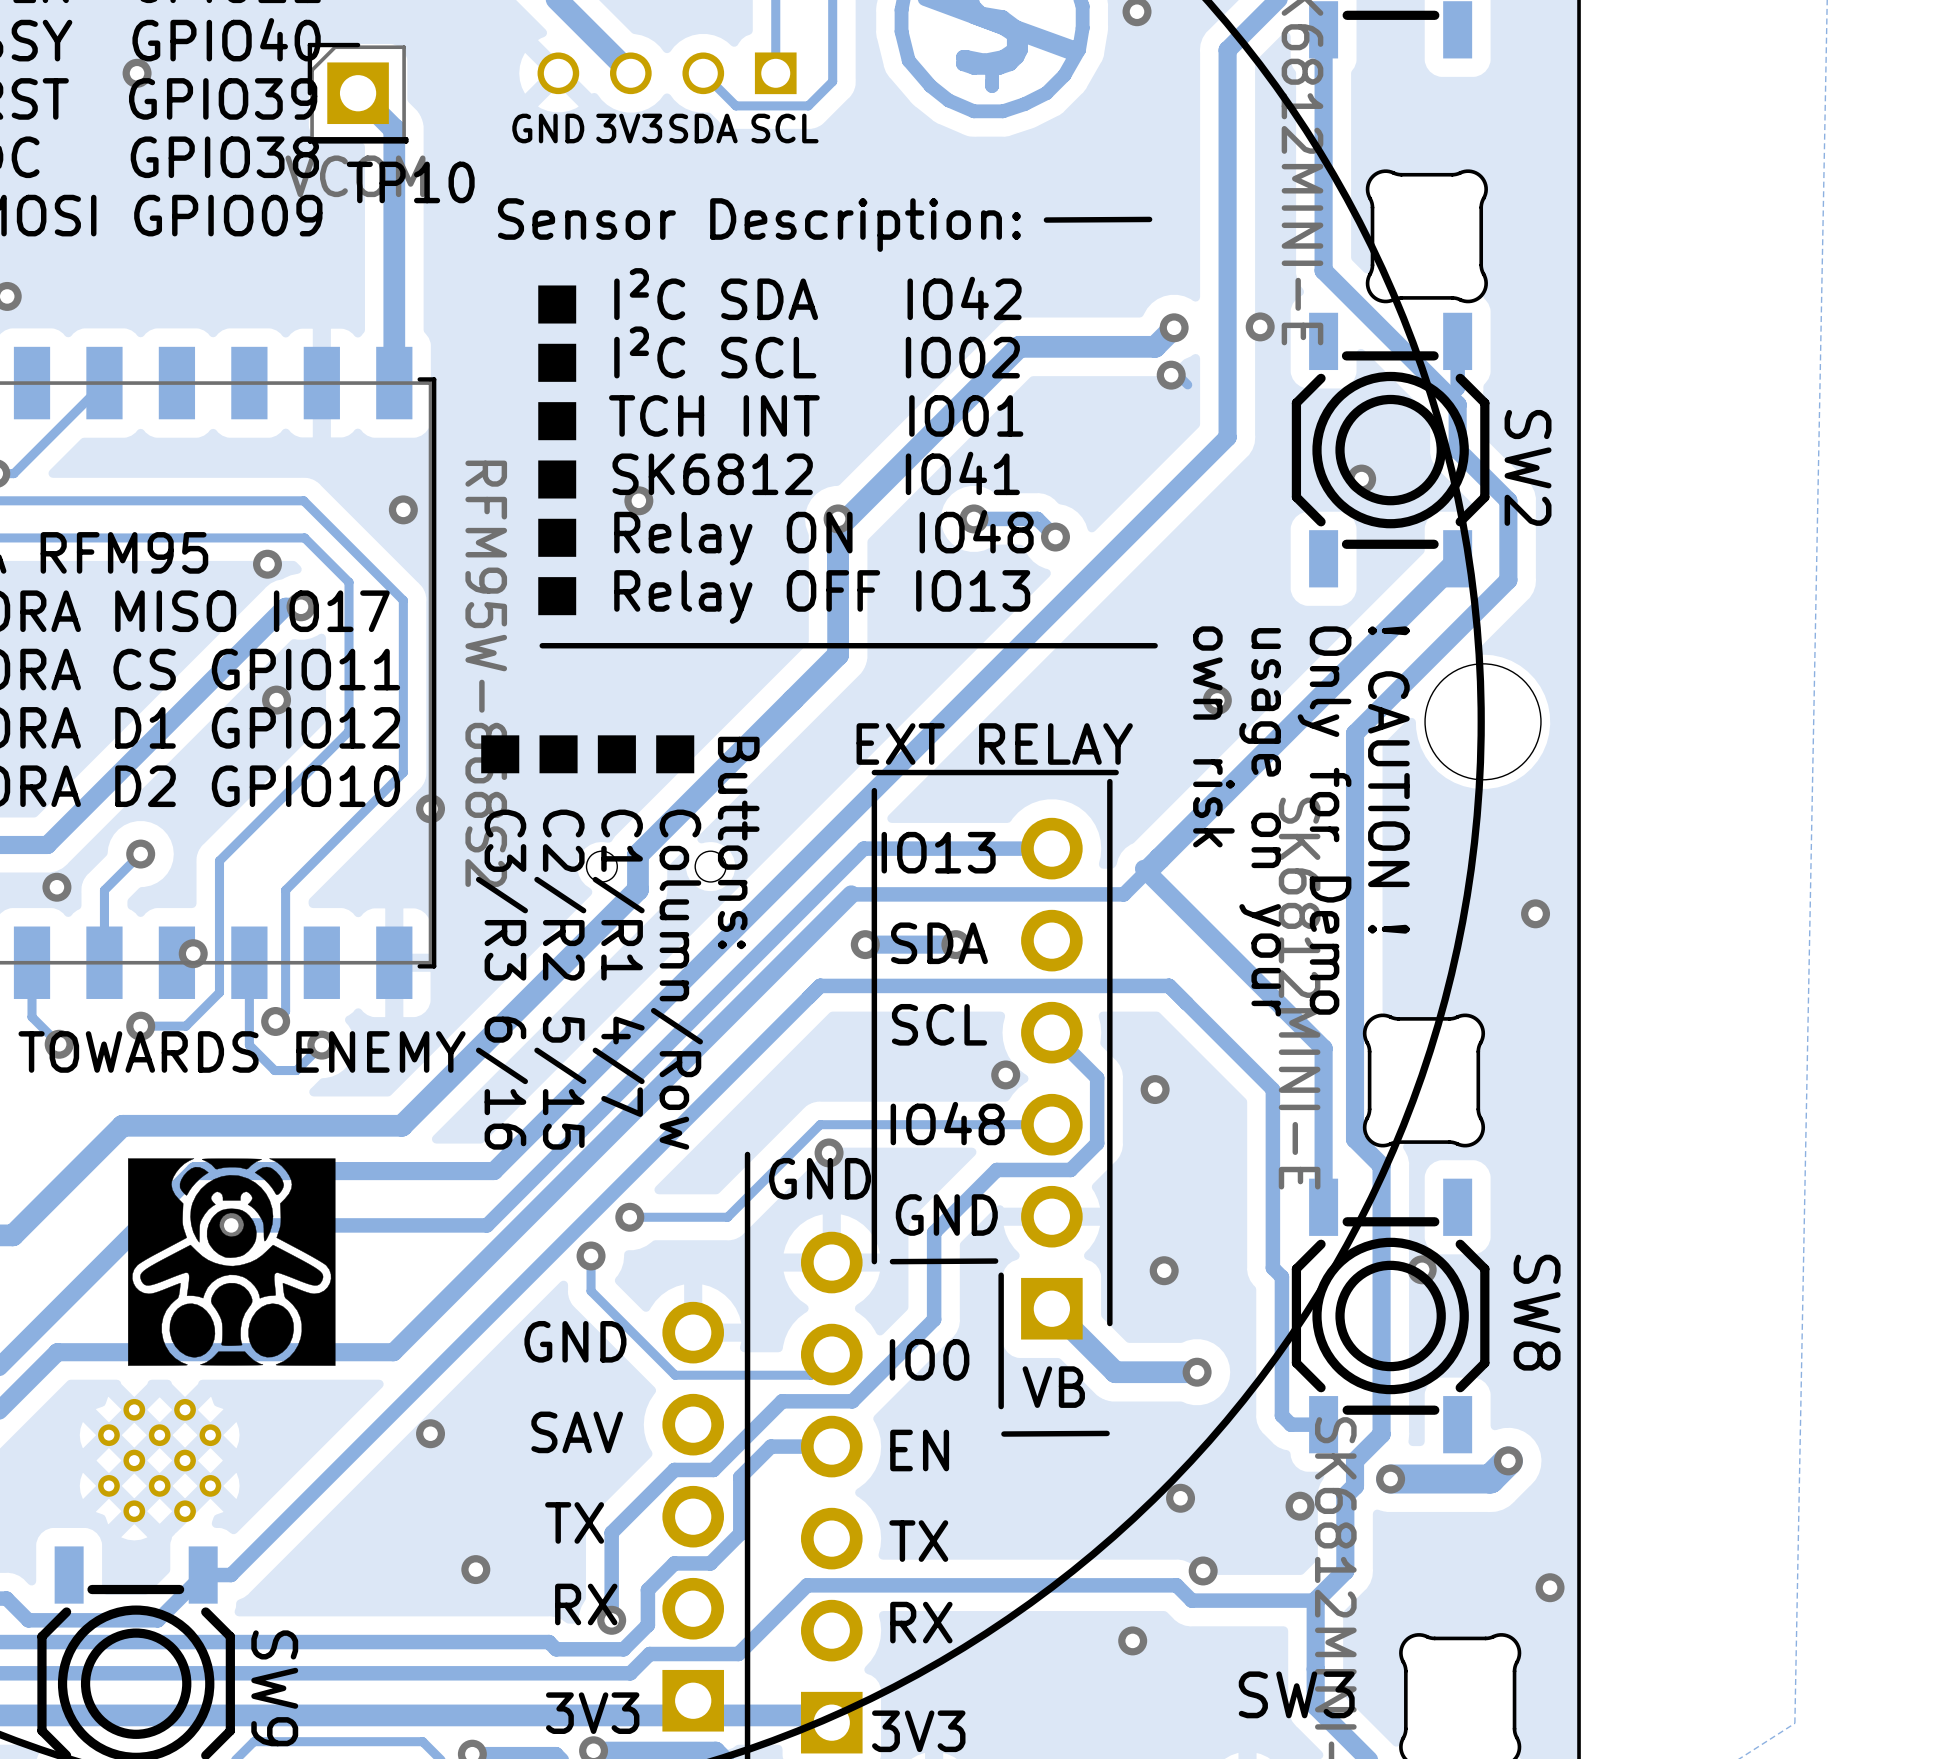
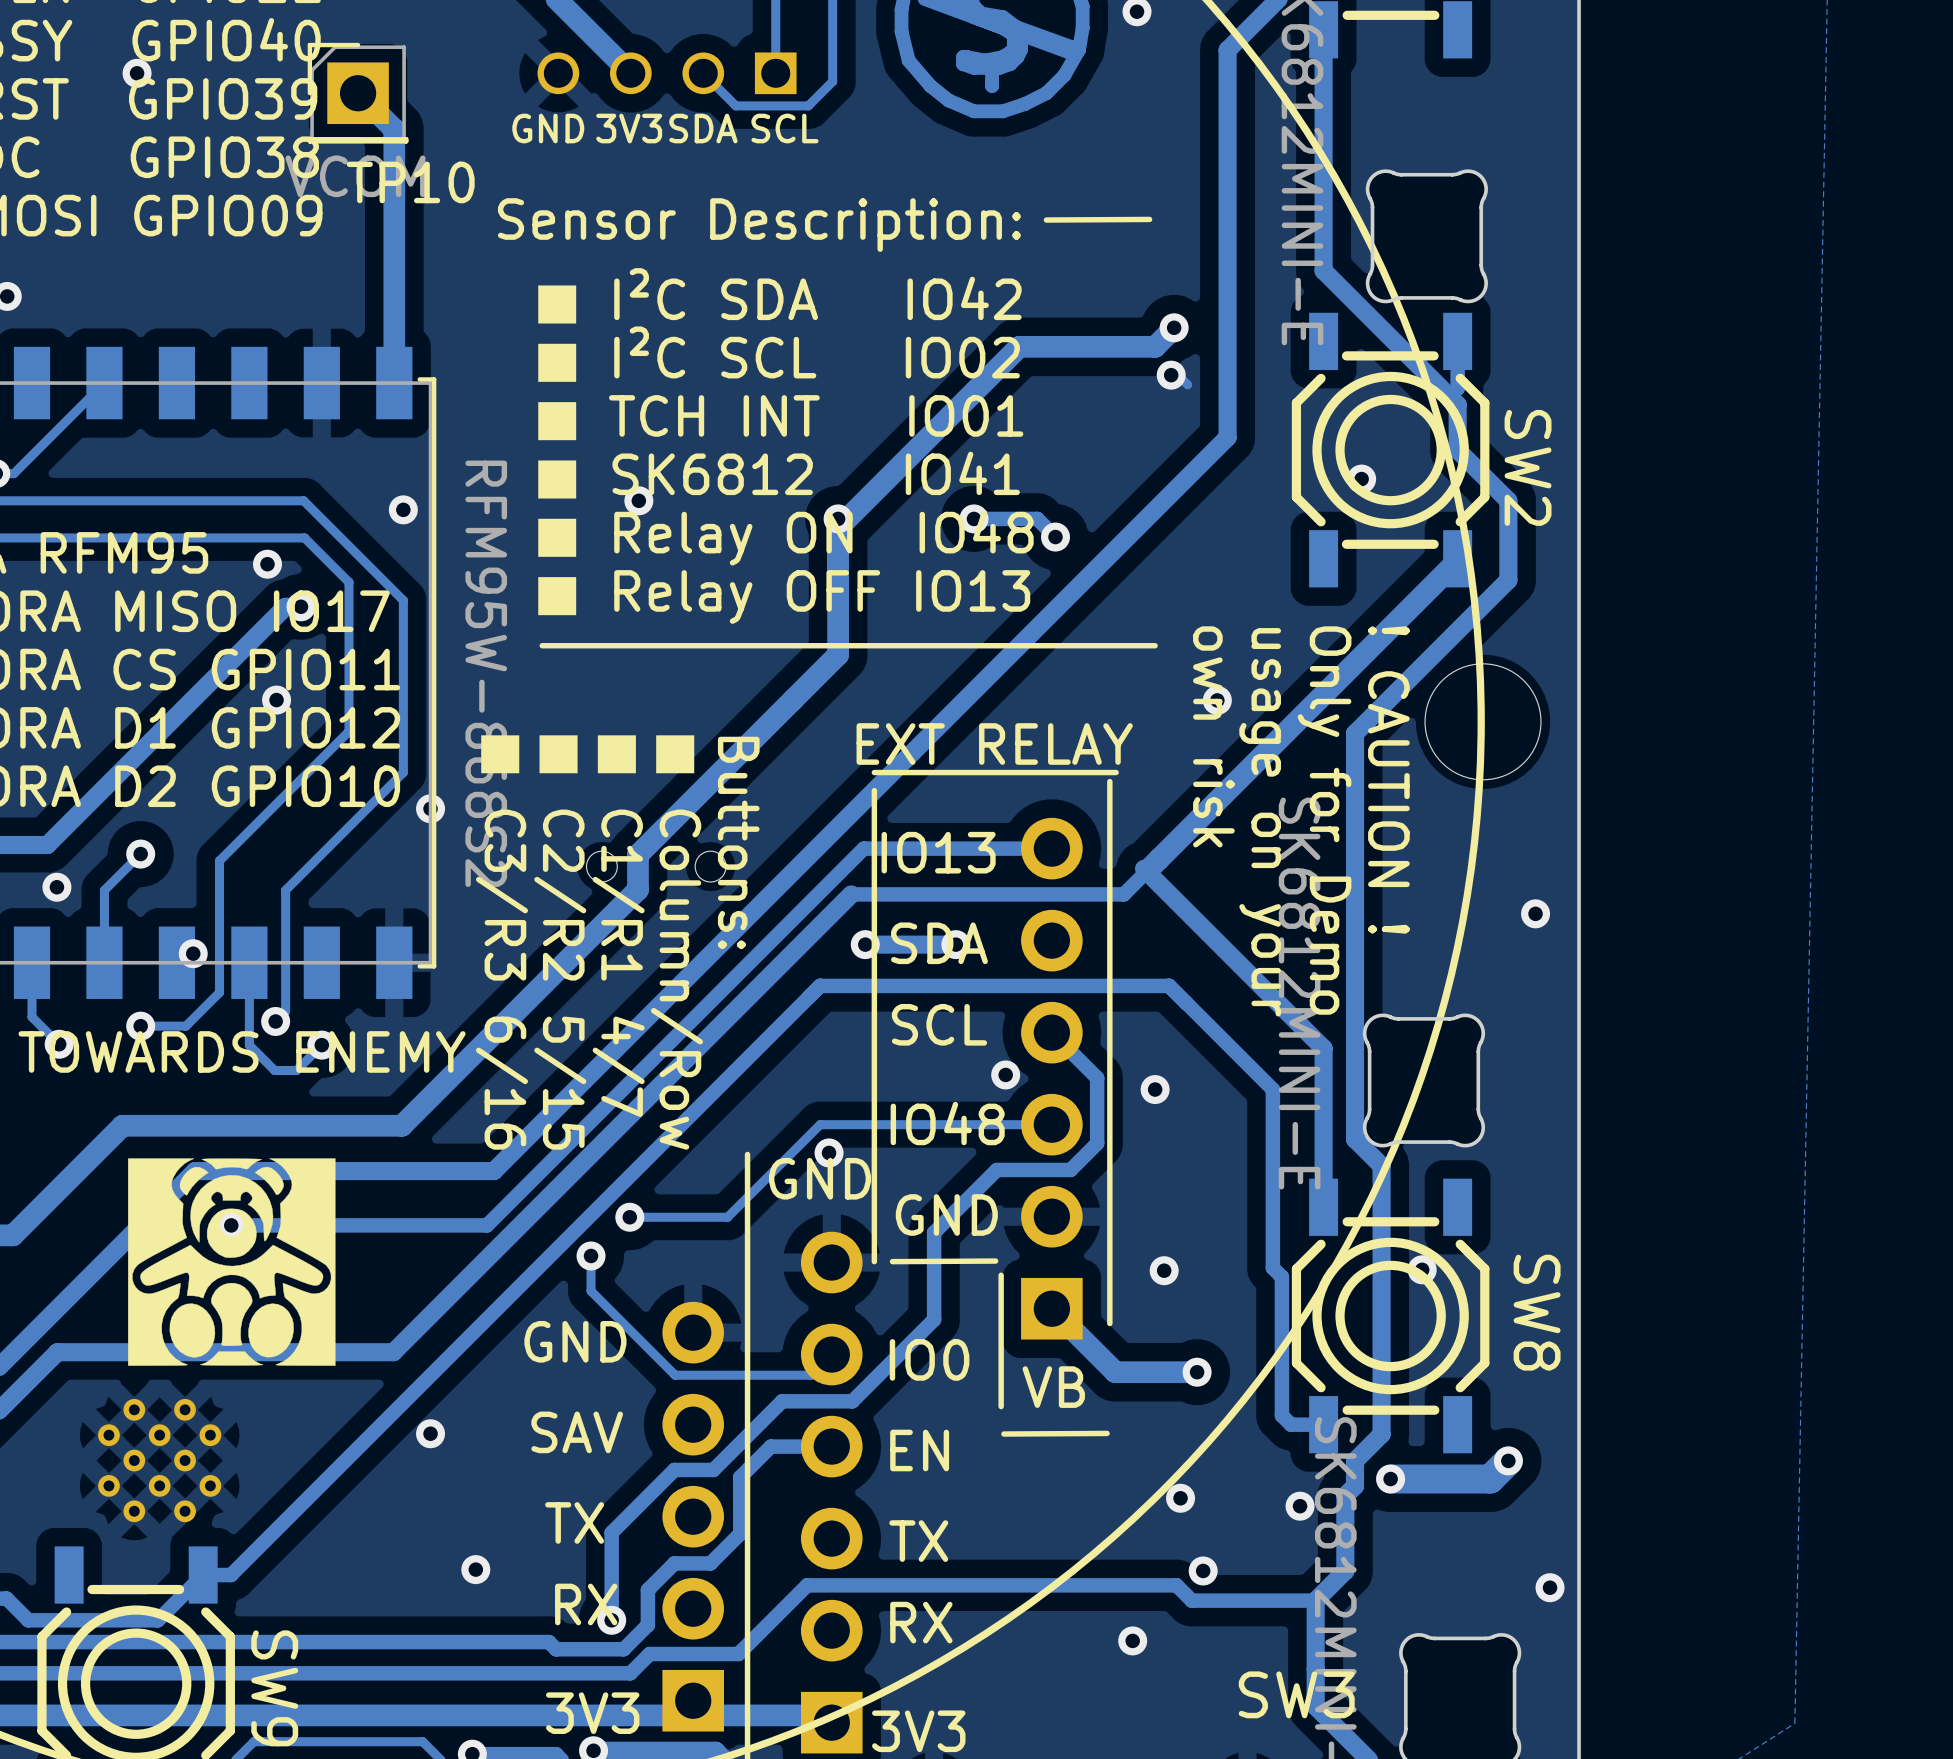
via: (1260, 326) -> none

